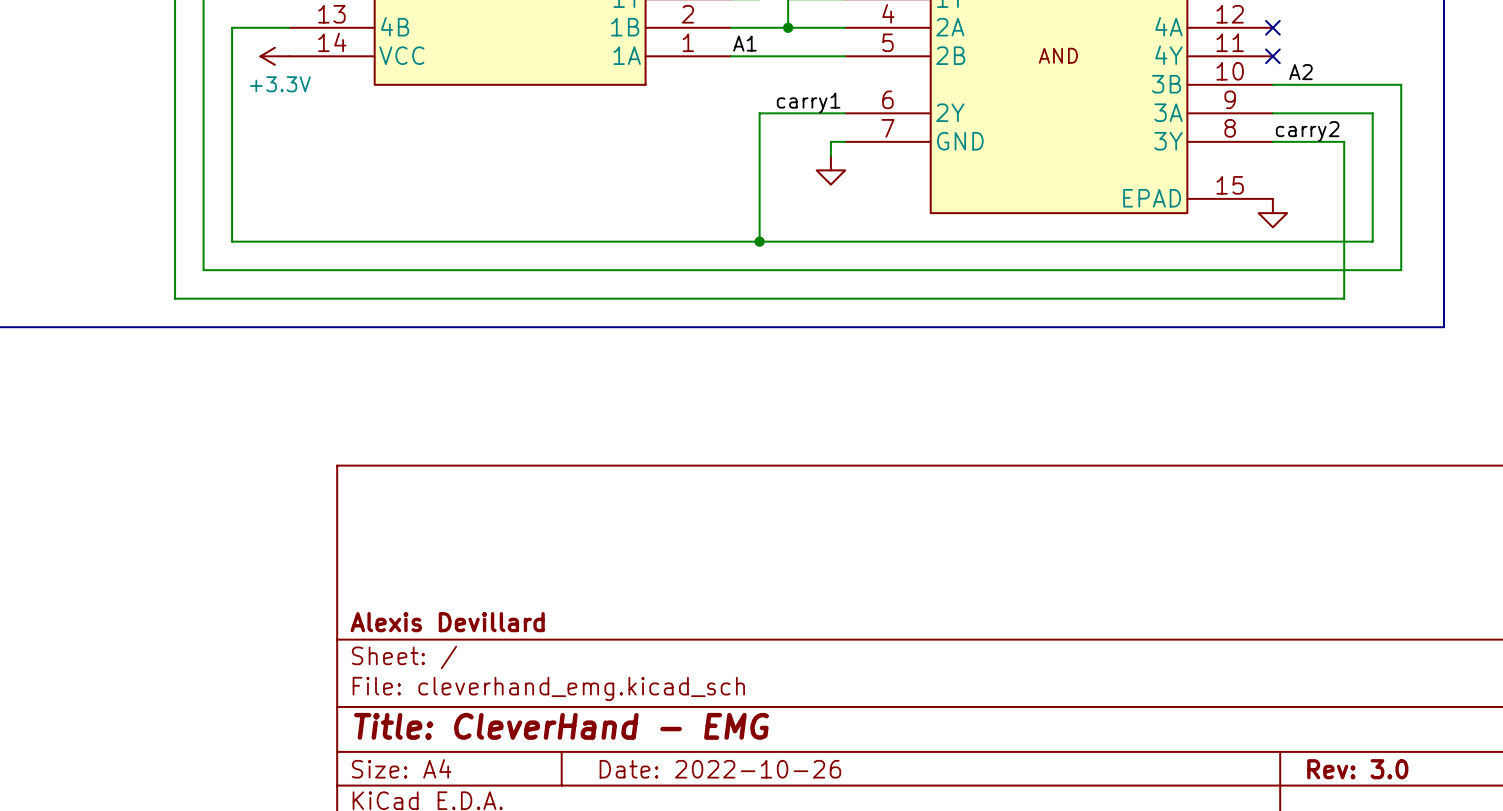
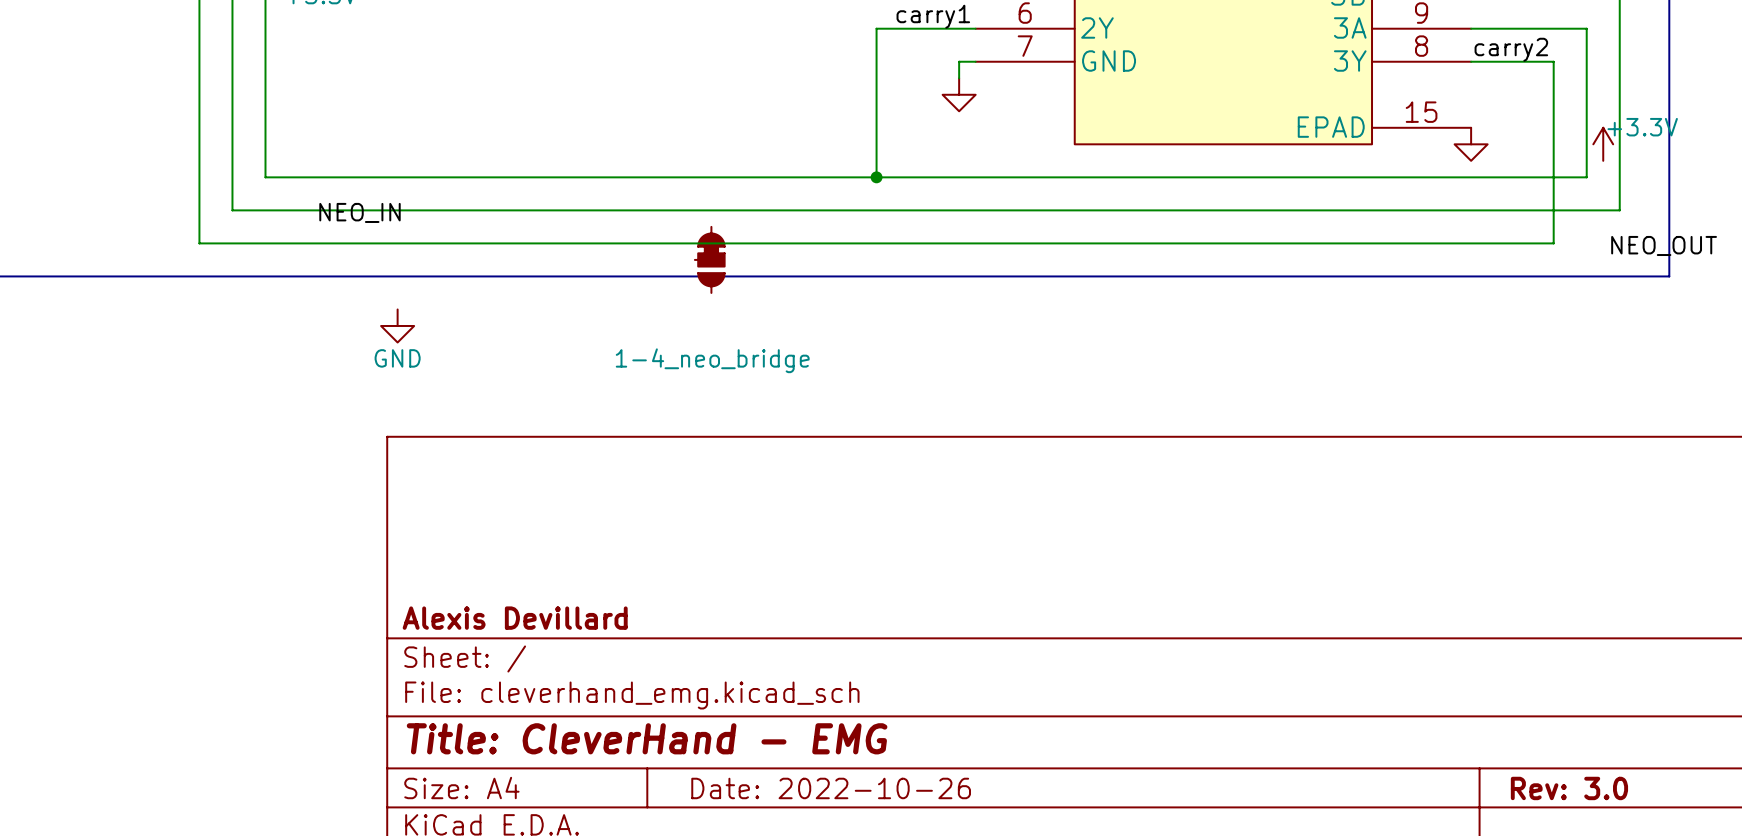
power symbol: none -> +3.3V (1603, 144)
label: none -> NEO_IN (359, 212)
label: none -> NEO_OUT (1664, 245)
part: none -> 1-4_neo_bridge (709, 259)
power symbol: none -> GND (397, 325)

